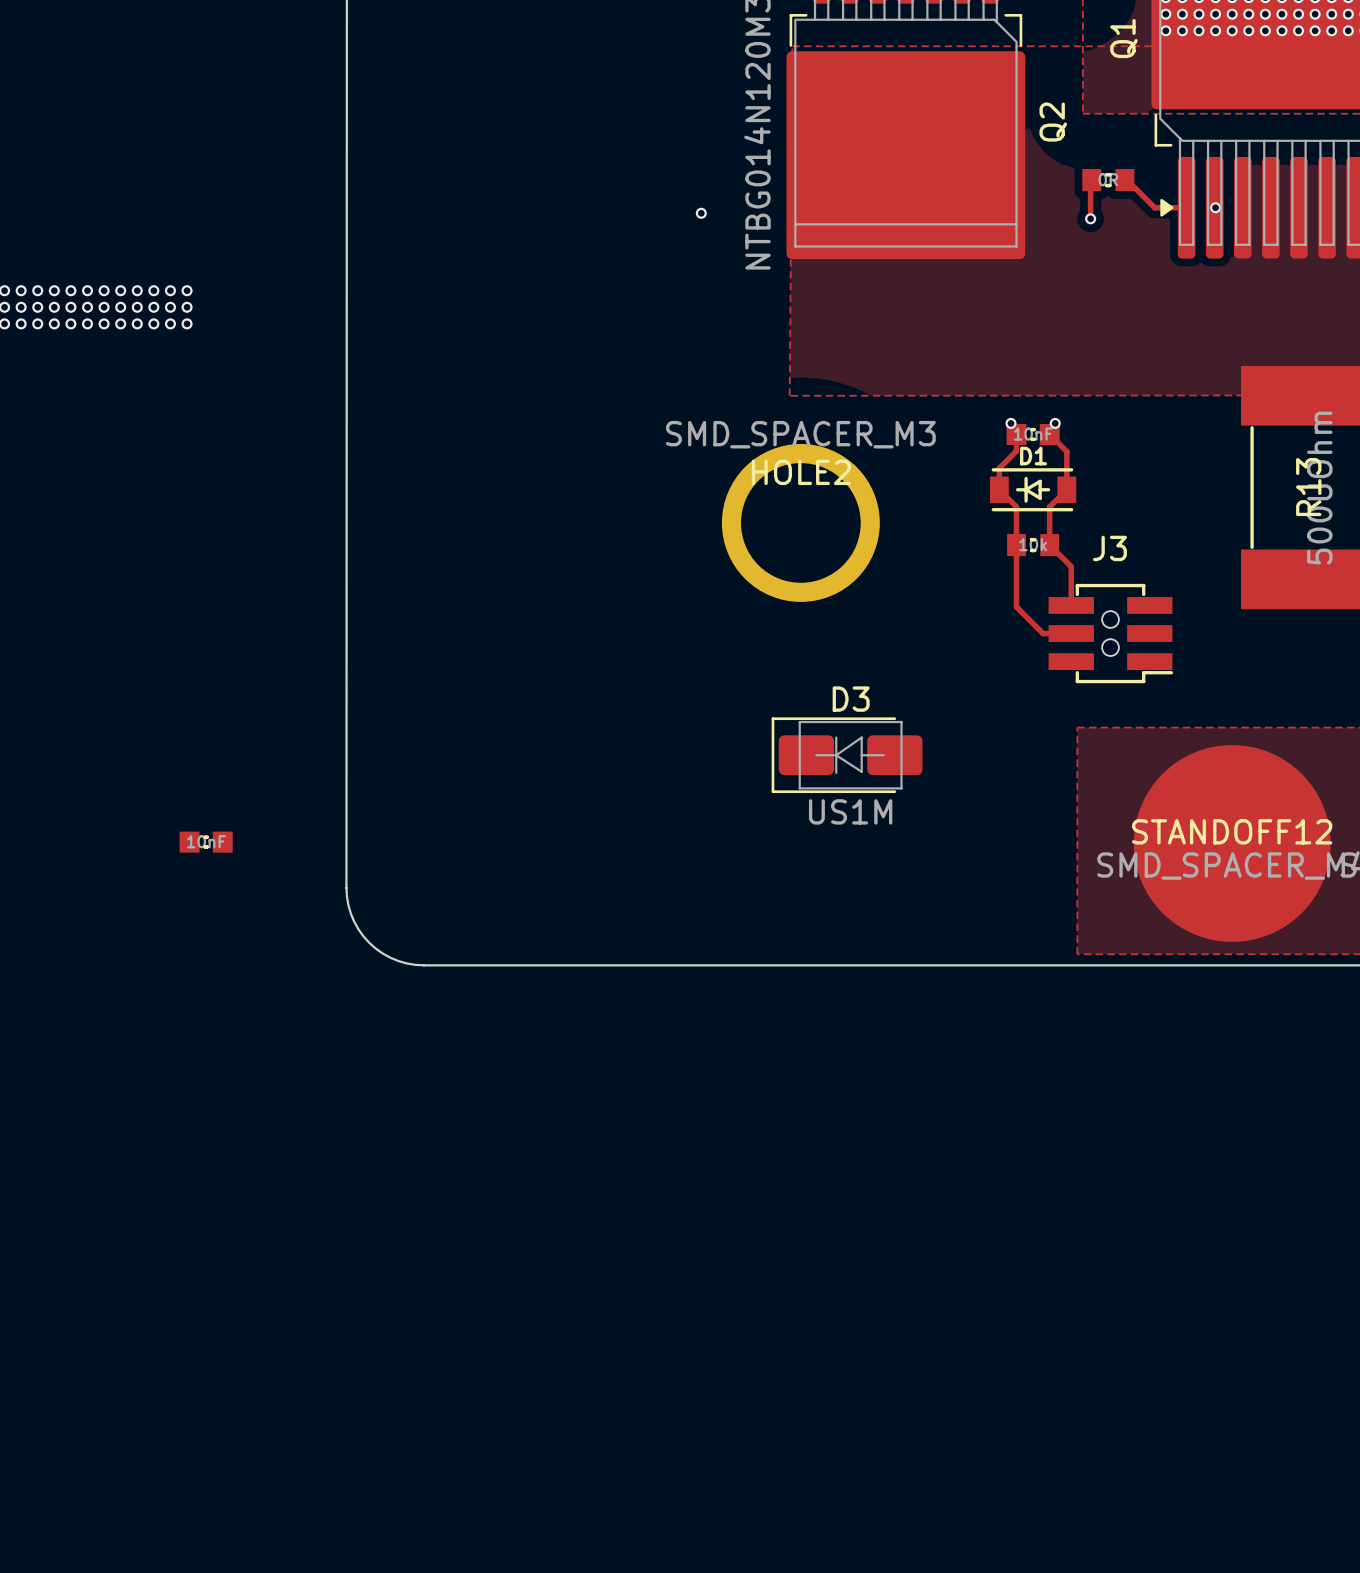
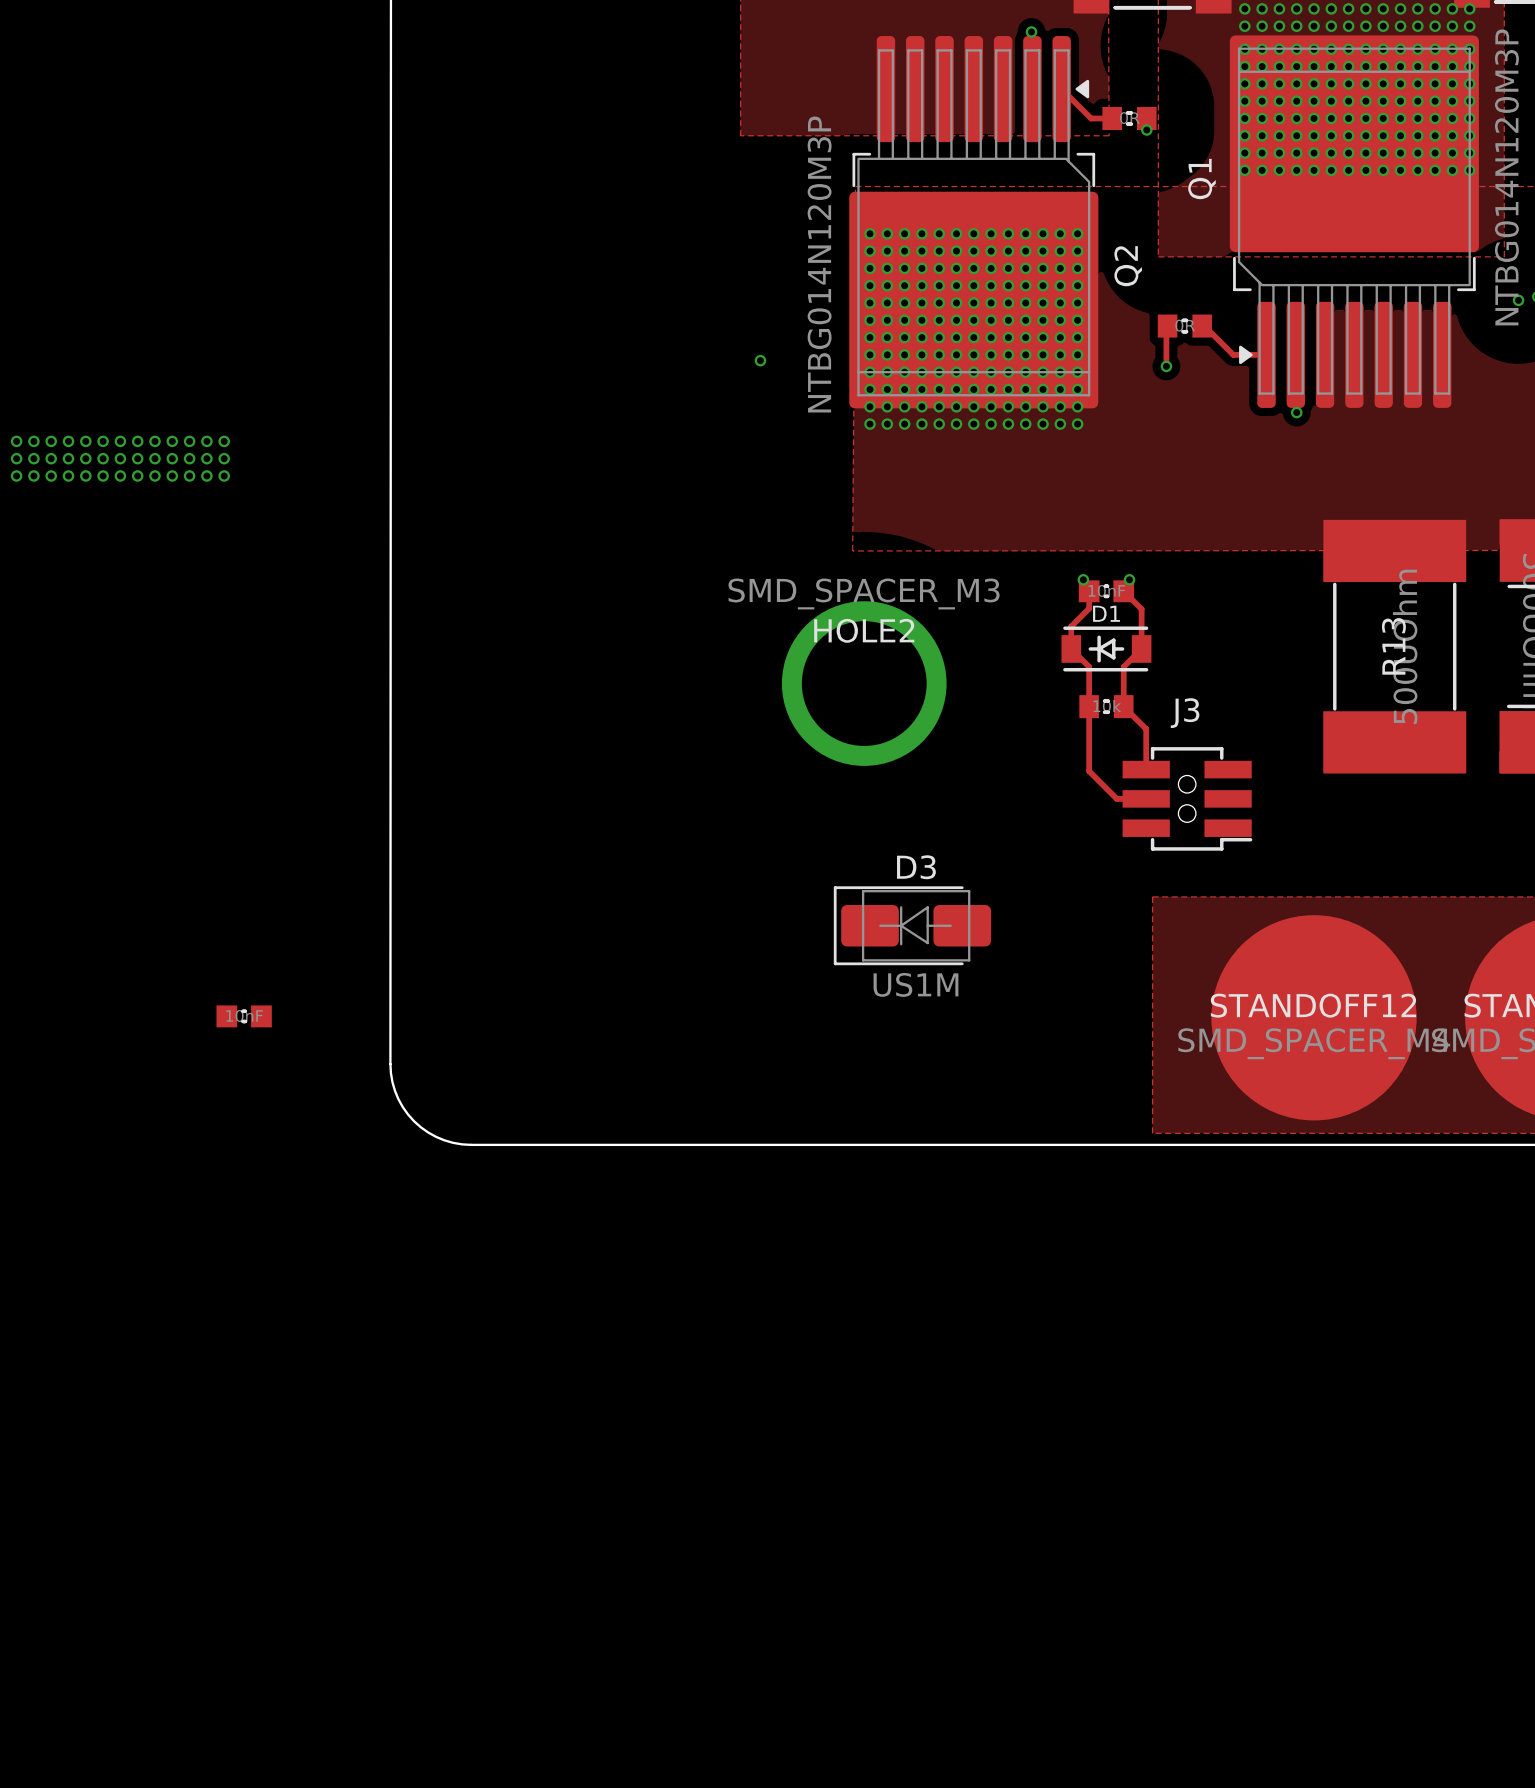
via: none -> (870, 233)
via: none -> (887, 233)
via: none -> (904, 233)
via: none -> (921, 233)
via: none -> (939, 233)
via: none -> (956, 233)
via: none -> (973, 233)
via: none -> (991, 233)
via: none -> (1008, 233)
via: none -> (1025, 233)
via: none -> (1043, 233)
via: none -> (1060, 233)
via: none -> (1077, 233)
via: none -> (870, 251)
via: none -> (887, 251)
via: none -> (904, 251)
via: none -> (921, 251)
via: none -> (939, 251)
via: none -> (956, 251)
via: none -> (973, 251)
via: none -> (991, 251)
via: none -> (1008, 251)
via: none -> (1025, 251)
via: none -> (1043, 251)
via: none -> (1060, 251)
via: none -> (1077, 251)
via: none -> (870, 268)
via: none -> (887, 268)
via: none -> (904, 268)
via: none -> (921, 268)
via: none -> (939, 268)
via: none -> (956, 268)
via: none -> (973, 268)
via: none -> (991, 268)
via: none -> (1008, 268)
via: none -> (1025, 268)
via: none -> (1043, 268)
via: none -> (1060, 268)
via: none -> (1077, 268)
via: none -> (870, 285)
via: none -> (887, 285)
via: none -> (904, 285)
via: none -> (921, 285)
via: none -> (939, 285)
via: none -> (956, 285)
via: none -> (973, 285)
via: none -> (991, 285)
via: none -> (1008, 285)
via: none -> (1025, 285)
via: none -> (1043, 285)
via: none -> (1060, 285)
via: none -> (1077, 285)
via: none -> (870, 303)
via: none -> (887, 303)
via: none -> (904, 303)
via: none -> (921, 303)
via: none -> (939, 303)
via: none -> (956, 303)
via: none -> (973, 303)
via: none -> (991, 303)
via: none -> (1008, 303)
via: none -> (1025, 303)
via: none -> (1043, 303)
via: none -> (1060, 303)
via: none -> (1077, 303)
via: none -> (870, 320)
via: none -> (887, 320)
via: none -> (904, 320)
via: none -> (921, 320)
via: none -> (939, 320)
via: none -> (956, 320)
via: none -> (973, 320)
via: none -> (991, 320)
via: none -> (1008, 320)
via: none -> (1025, 320)
via: none -> (1043, 320)
via: none -> (1060, 320)
via: none -> (1077, 320)
via: none -> (870, 337)
via: none -> (887, 337)
via: none -> (904, 337)
via: none -> (921, 337)
via: none -> (939, 337)
via: none -> (956, 337)
via: none -> (973, 337)
via: none -> (991, 337)
via: none -> (1008, 337)
via: none -> (1025, 337)
via: none -> (1043, 337)
via: none -> (1060, 337)
via: none -> (1077, 337)
via: none -> (870, 354)
via: none -> (887, 354)
via: none -> (904, 354)
via: none -> (921, 354)
via: none -> (939, 354)
via: none -> (956, 354)
via: none -> (973, 354)
via: none -> (991, 354)
via: none -> (1008, 354)
via: none -> (1025, 354)
via: none -> (1043, 354)
via: none -> (1060, 354)
via: none -> (1077, 354)
via position: (1215, 207) -> (1296, 412)
via: none -> (870, 372)
via: none -> (887, 372)
via: none -> (904, 372)
via: none -> (921, 372)
via: none -> (939, 372)
via: none -> (956, 372)
via: none -> (973, 372)
via: none -> (991, 372)
via: none -> (1008, 372)
via: none -> (1025, 372)
via: none -> (1043, 372)
via: none -> (1060, 372)
via: none -> (1077, 372)
via: none -> (870, 389)
via: none -> (887, 389)
via: none -> (904, 389)
via: none -> (921, 389)
via: none -> (939, 389)
via: none -> (956, 389)
via: none -> (973, 389)
via: none -> (991, 389)
via: none -> (1008, 389)
via: none -> (1025, 389)
via: none -> (1043, 389)
via: none -> (1060, 389)
via: none -> (1077, 389)
via: none -> (870, 406)
via: none -> (887, 406)
via: none -> (904, 406)
via: none -> (921, 406)
via: none -> (939, 406)
via: none -> (956, 406)
via: none -> (973, 406)
via: none -> (991, 406)
via: none -> (1008, 406)
via: none -> (1025, 406)
via: none -> (1043, 406)
via: none -> (1060, 406)
via: none -> (1077, 406)
via: none -> (870, 424)
via: none -> (887, 424)
via: none -> (904, 424)
via: none -> (921, 424)
via: none -> (939, 424)
via: none -> (956, 424)
via: none -> (973, 424)
via: none -> (991, 424)
via: none -> (1008, 424)
via: none -> (1025, 424)
via: none -> (1043, 424)
via: none -> (1060, 424)
via: none -> (1077, 424)

